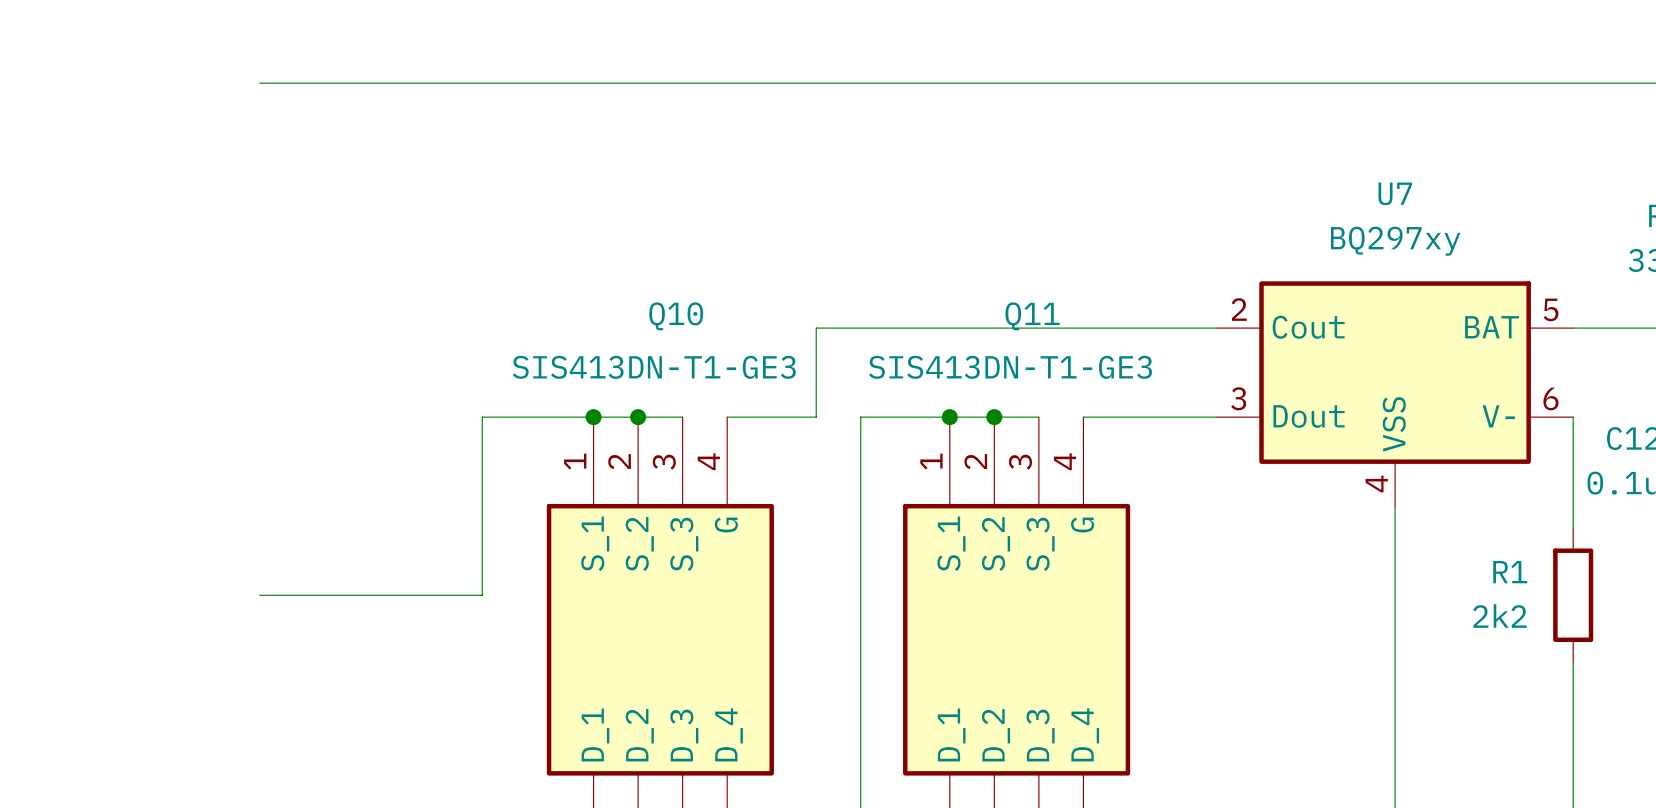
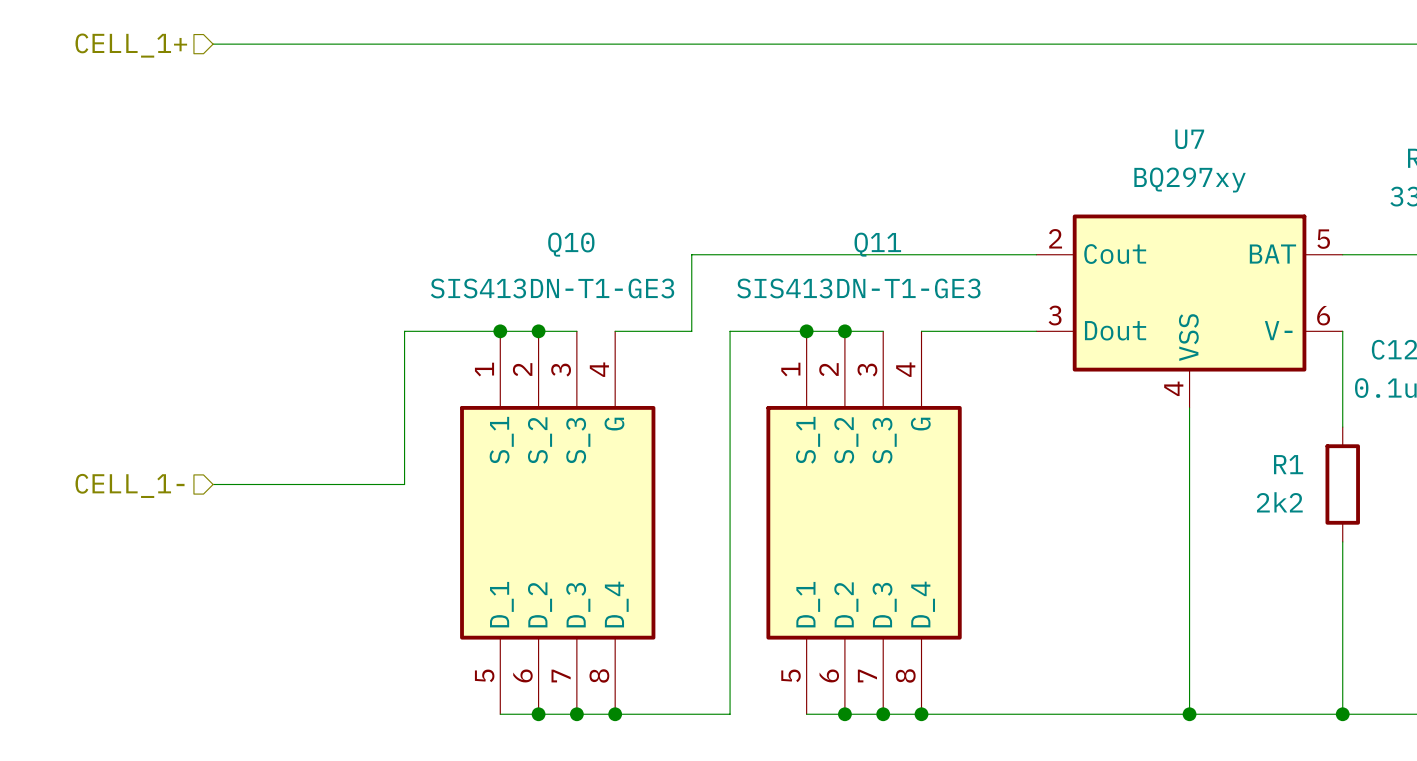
hierarchical label: none -> CELL_1+ (131, 45)
hierarchical label: none -> CELL_1- (130, 485)

